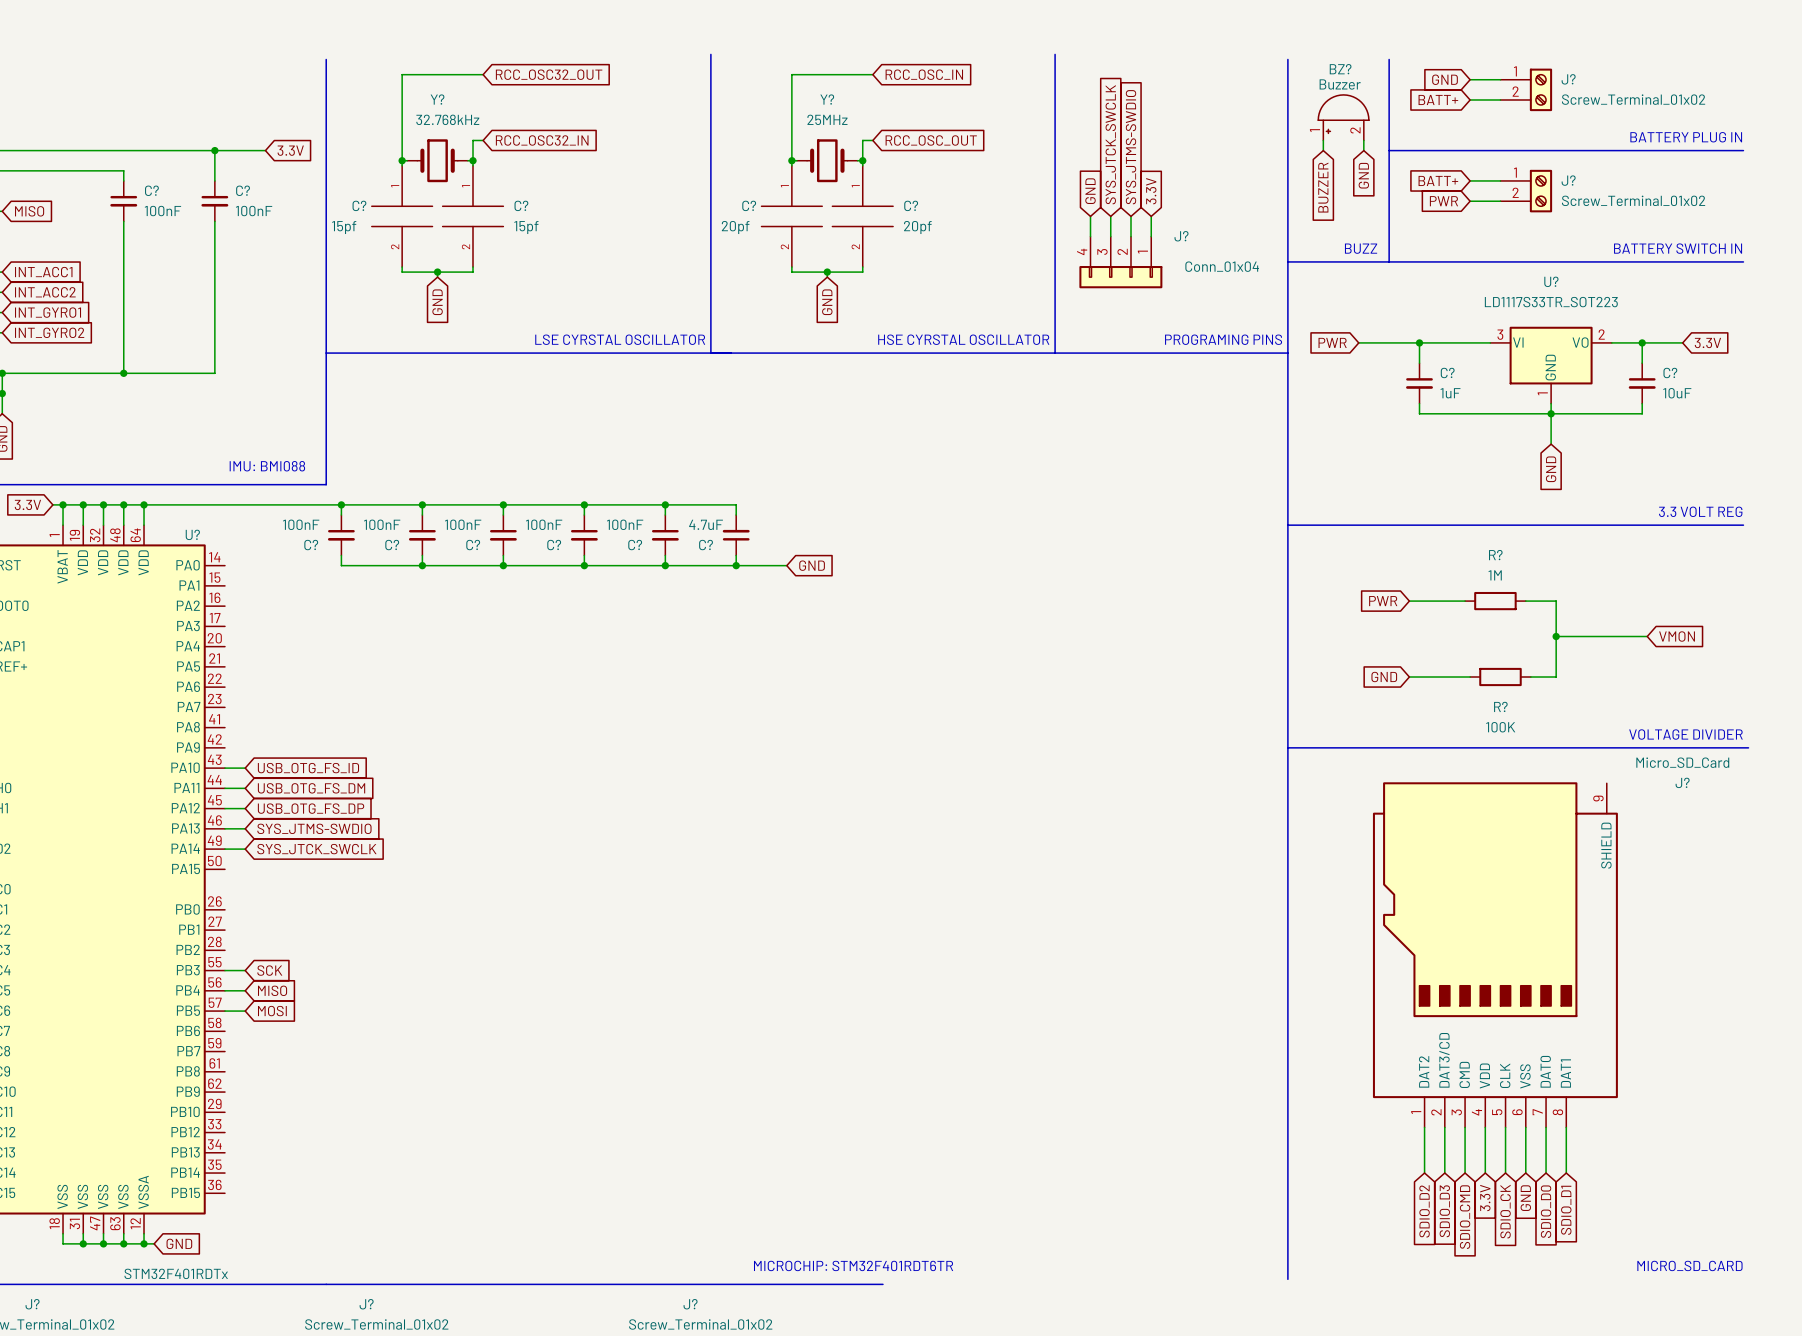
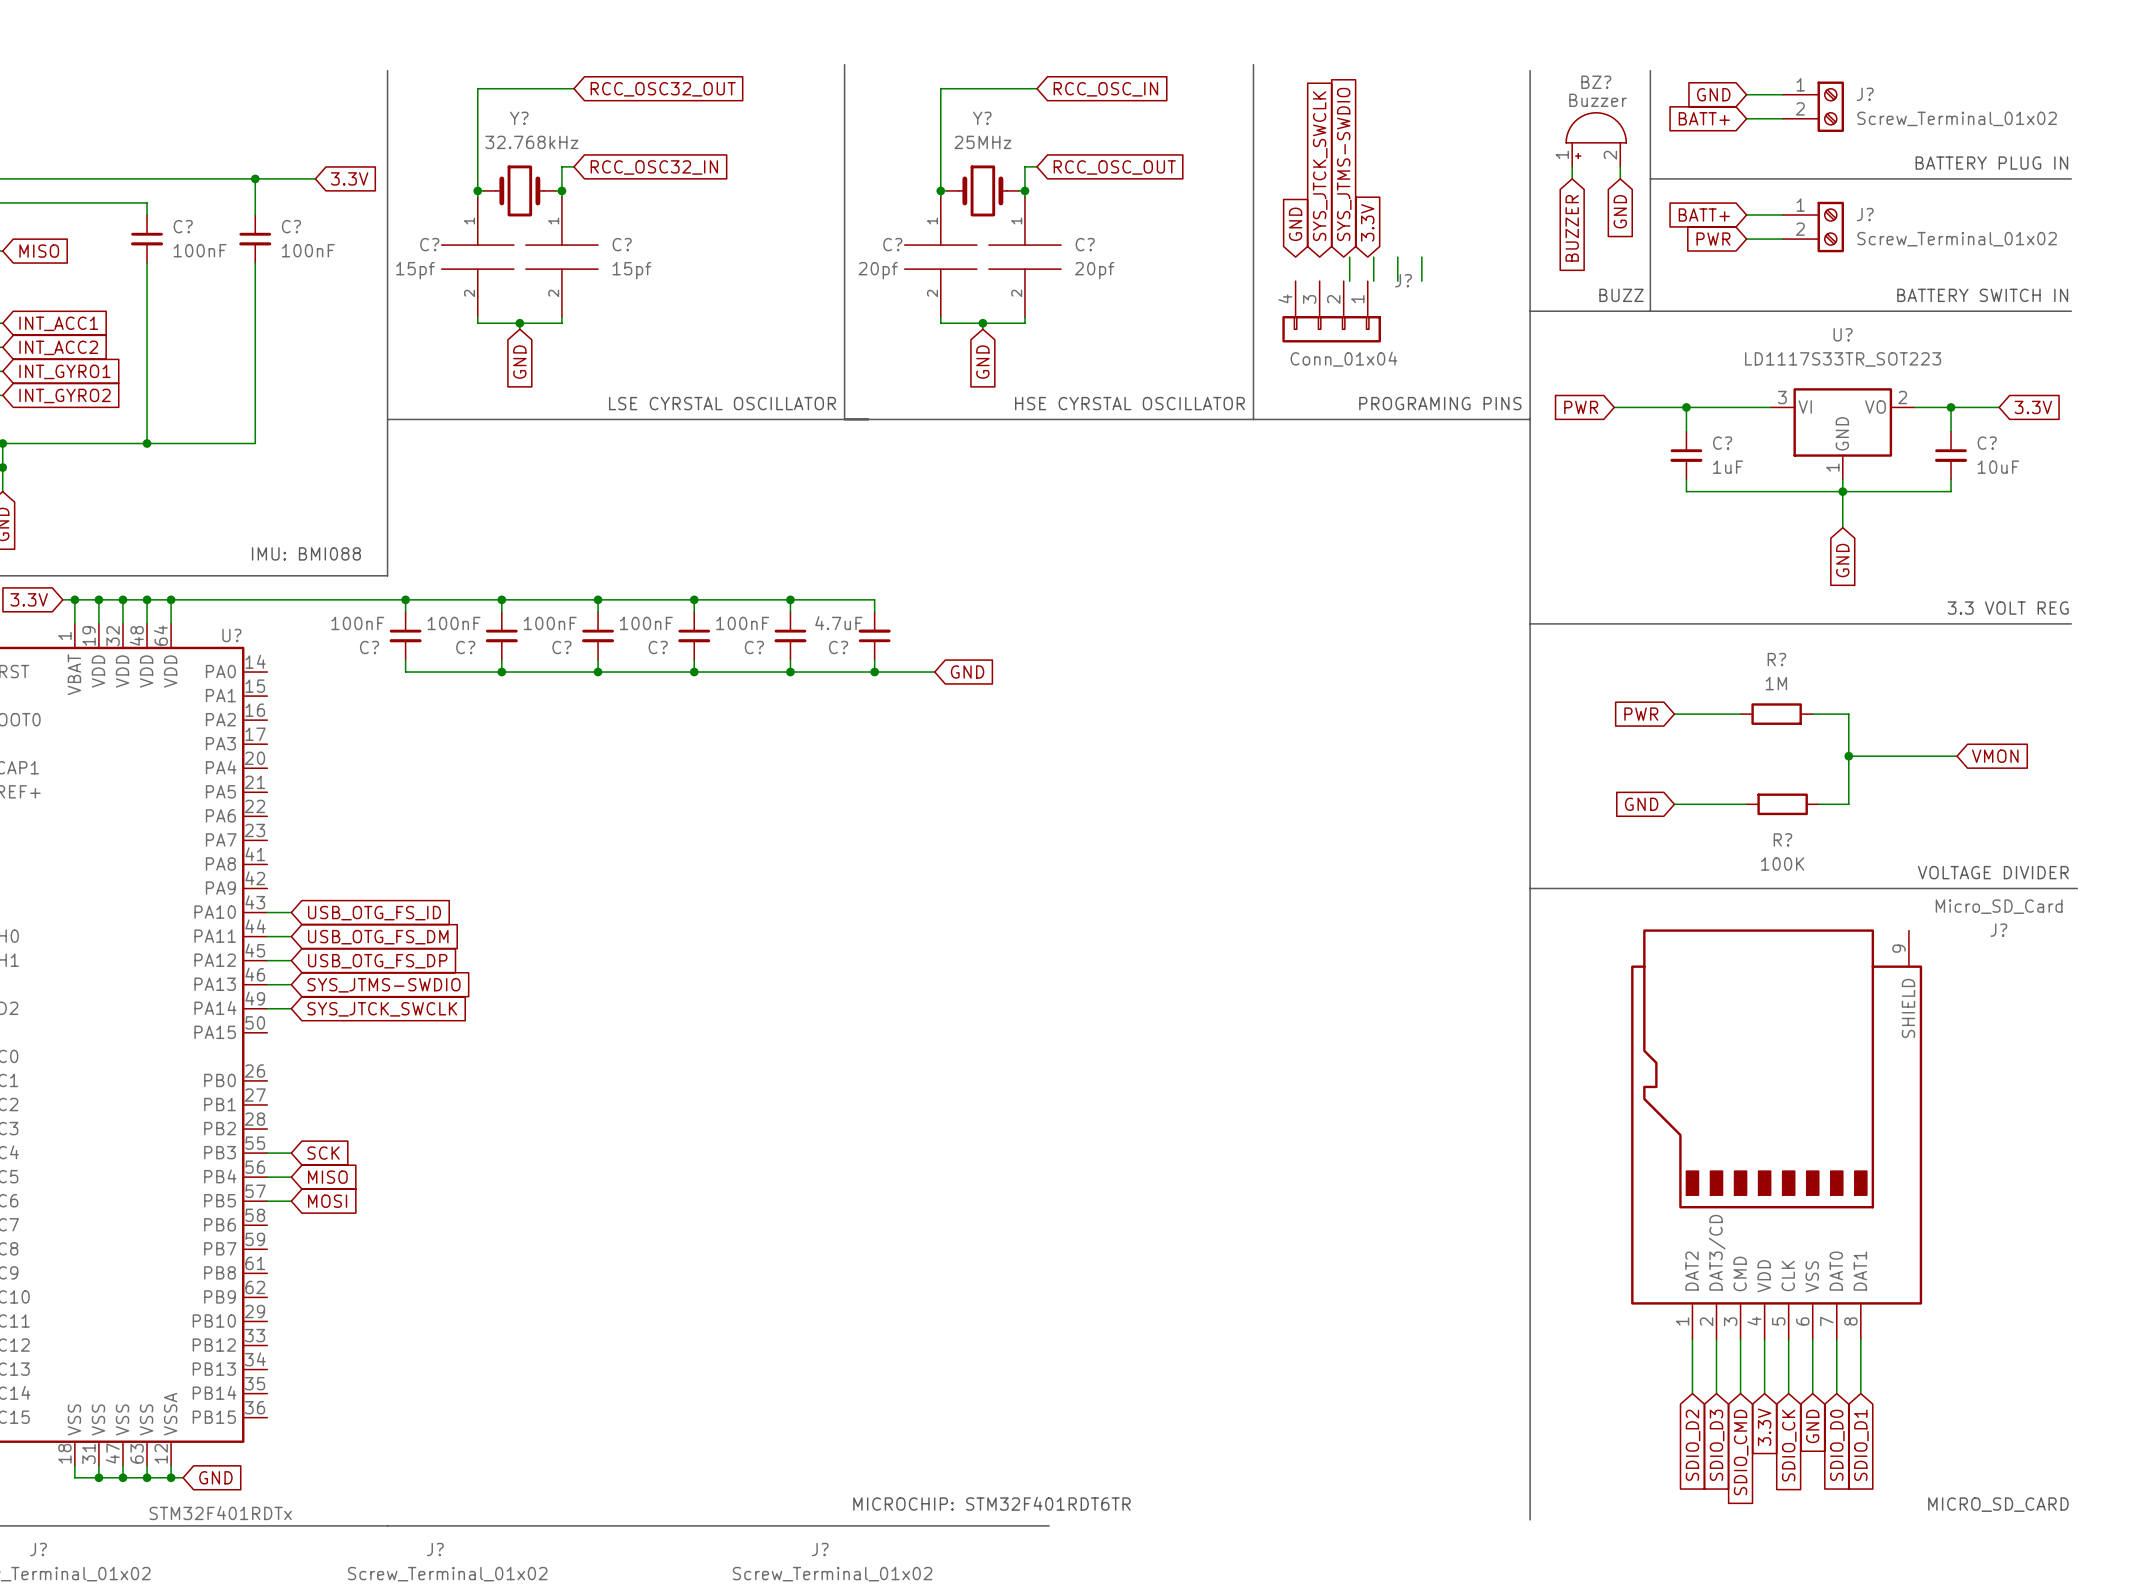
wire: (1090, 216) (1090, 236) -> (1349, 257) (1349, 281)
wire: (1110, 216) (1110, 236) -> (1373, 257) (1373, 281)
wire: (1131, 216) (1131, 236) -> (1397, 257) (1397, 281)
wire: (1151, 216) (1151, 236) -> (1421, 257) (1421, 281)
J? value position: Conn_01x04 (1222, 266) -> Conn_01x04 (1343, 359)

